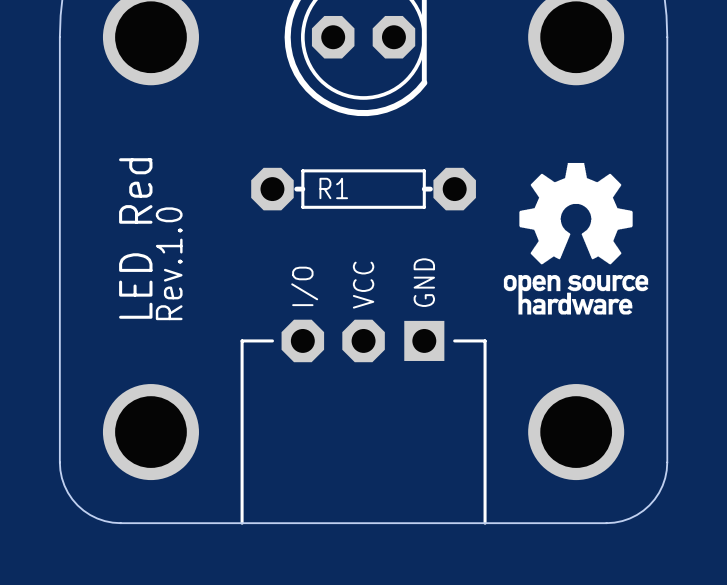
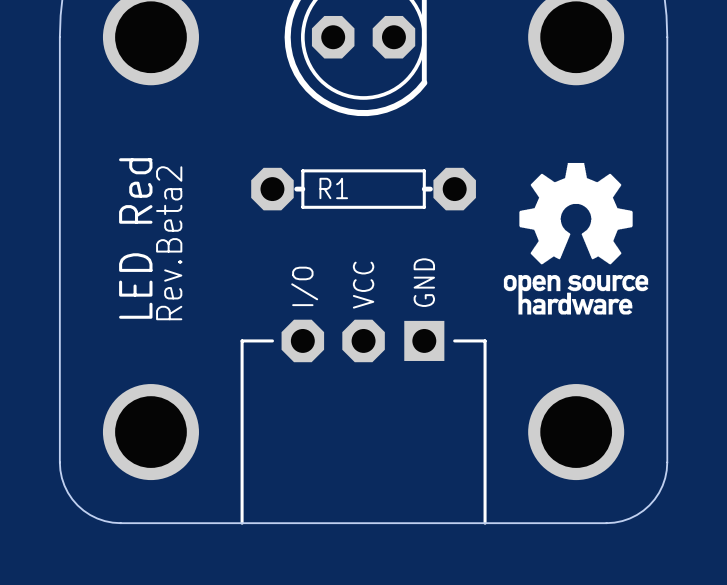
text: Rev.1.0 (169, 263) -> Rev.Beta2 (169, 243)

